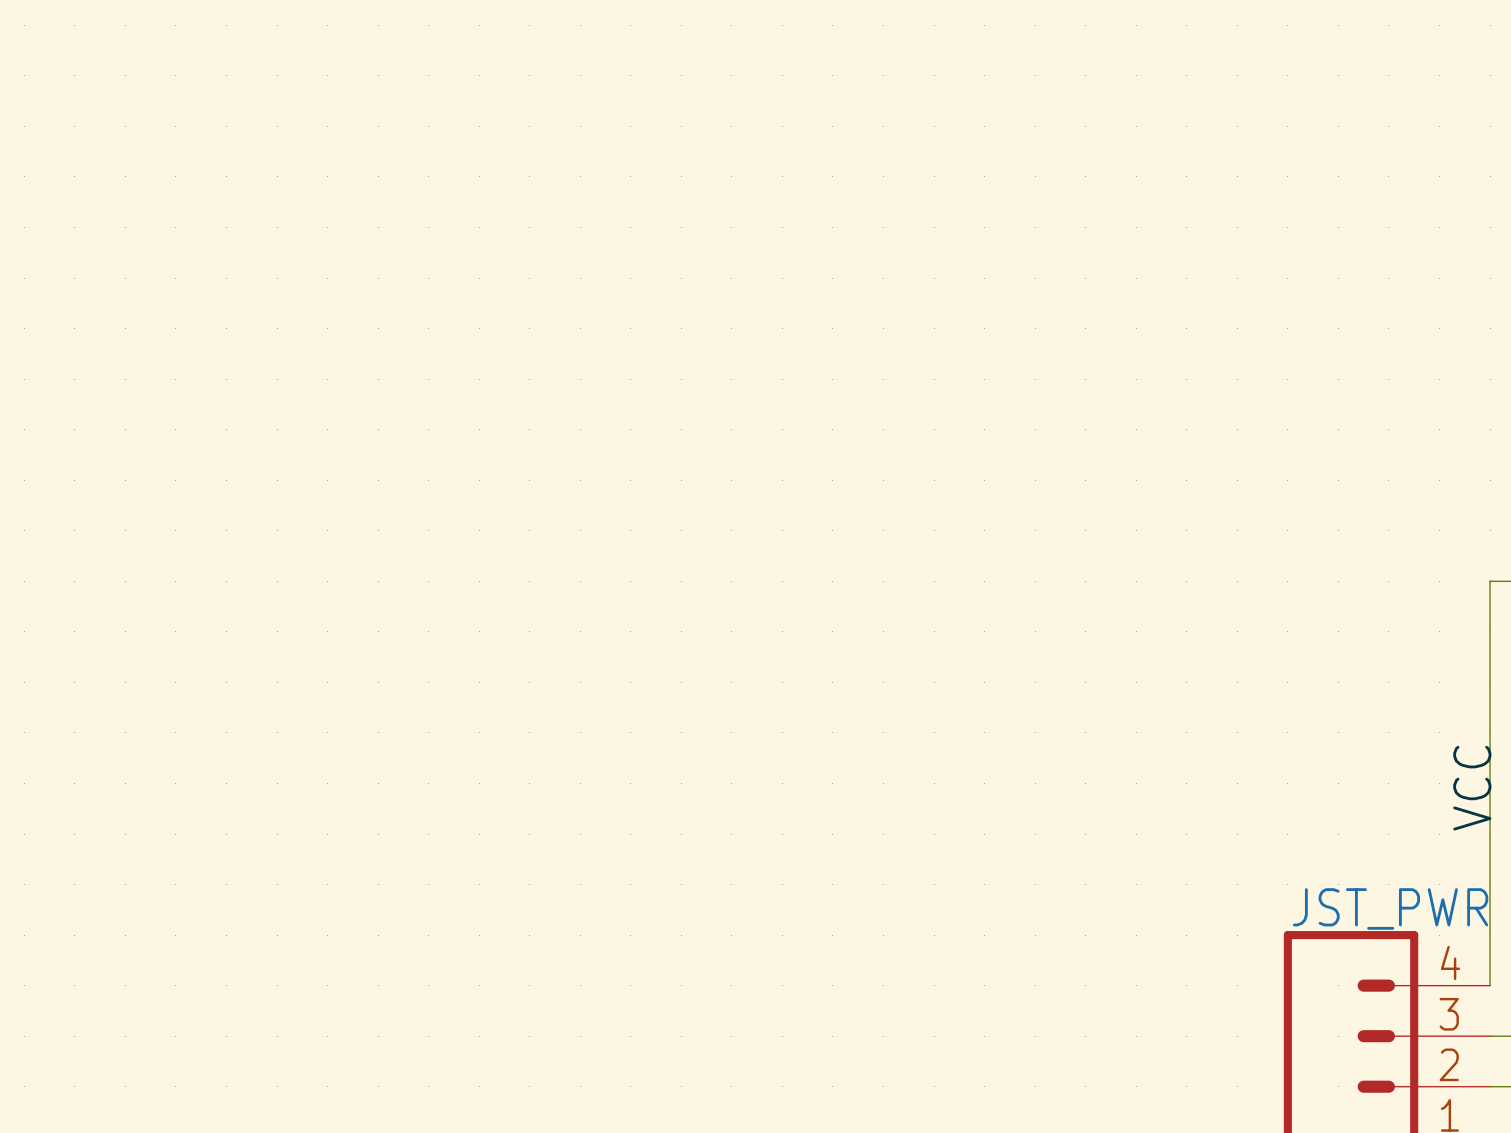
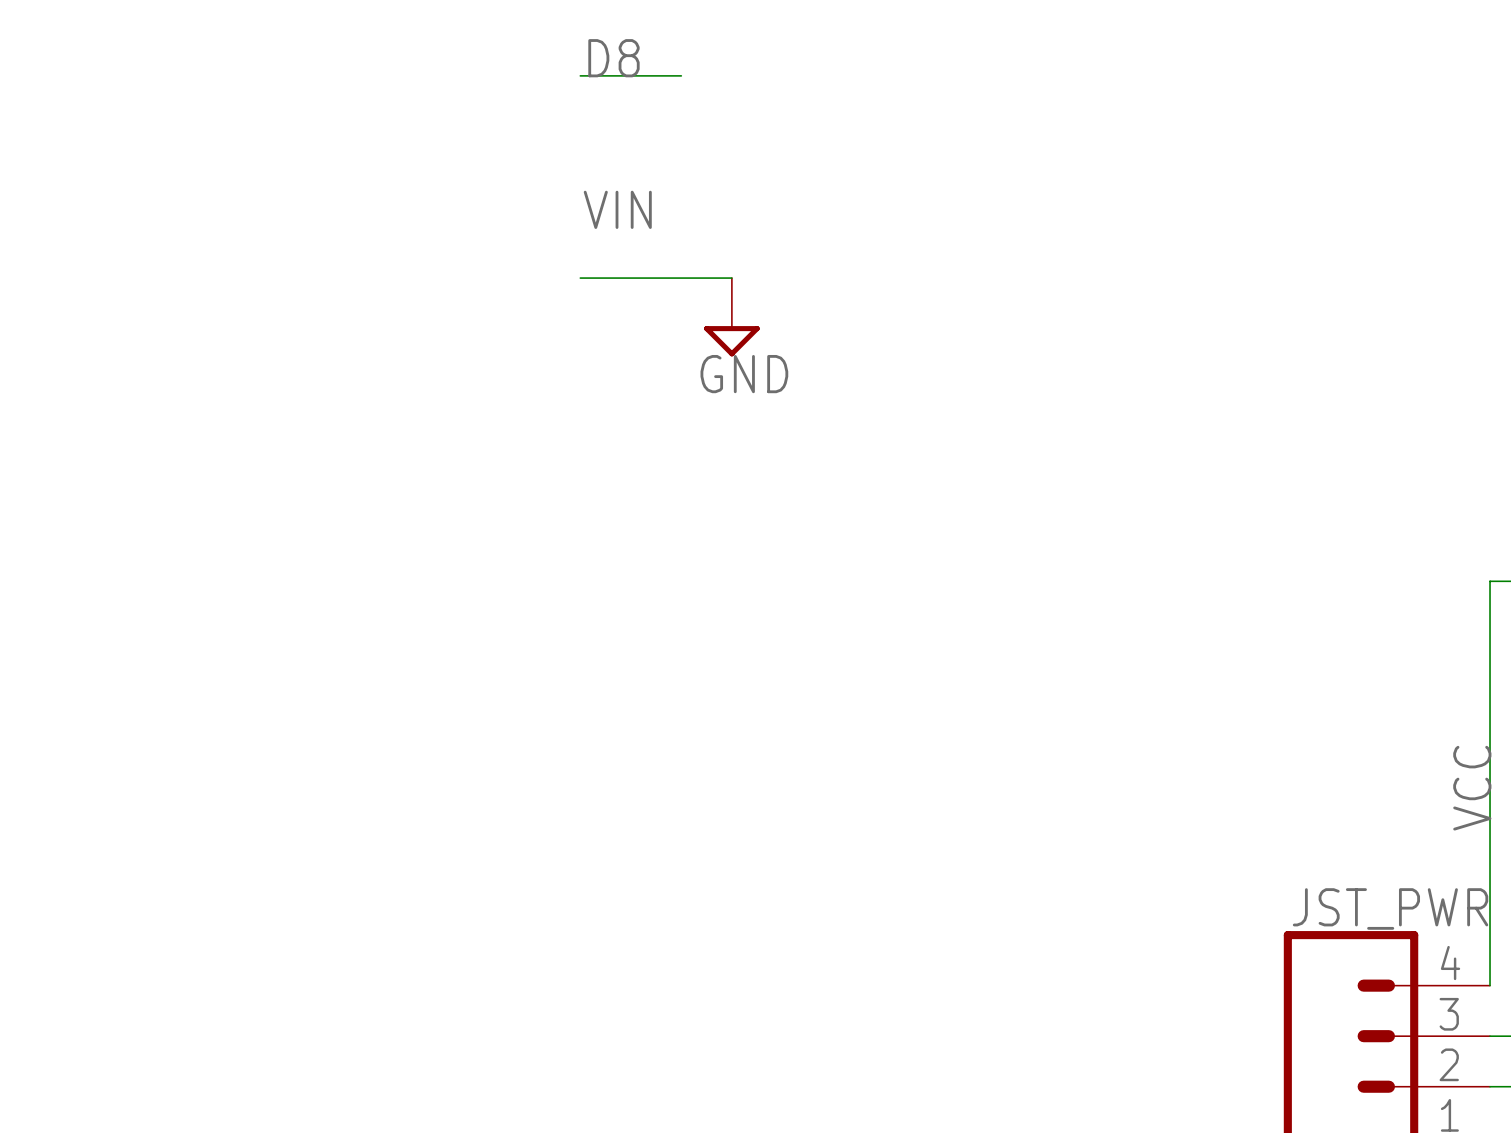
label: none -> D8 (613, 58)
wire: none -> (580, 75) (681, 75)
label: none -> VIN (617, 209)
wire: none -> (580, 278) (731, 278)
power symbol: none -> GND (731, 317)

